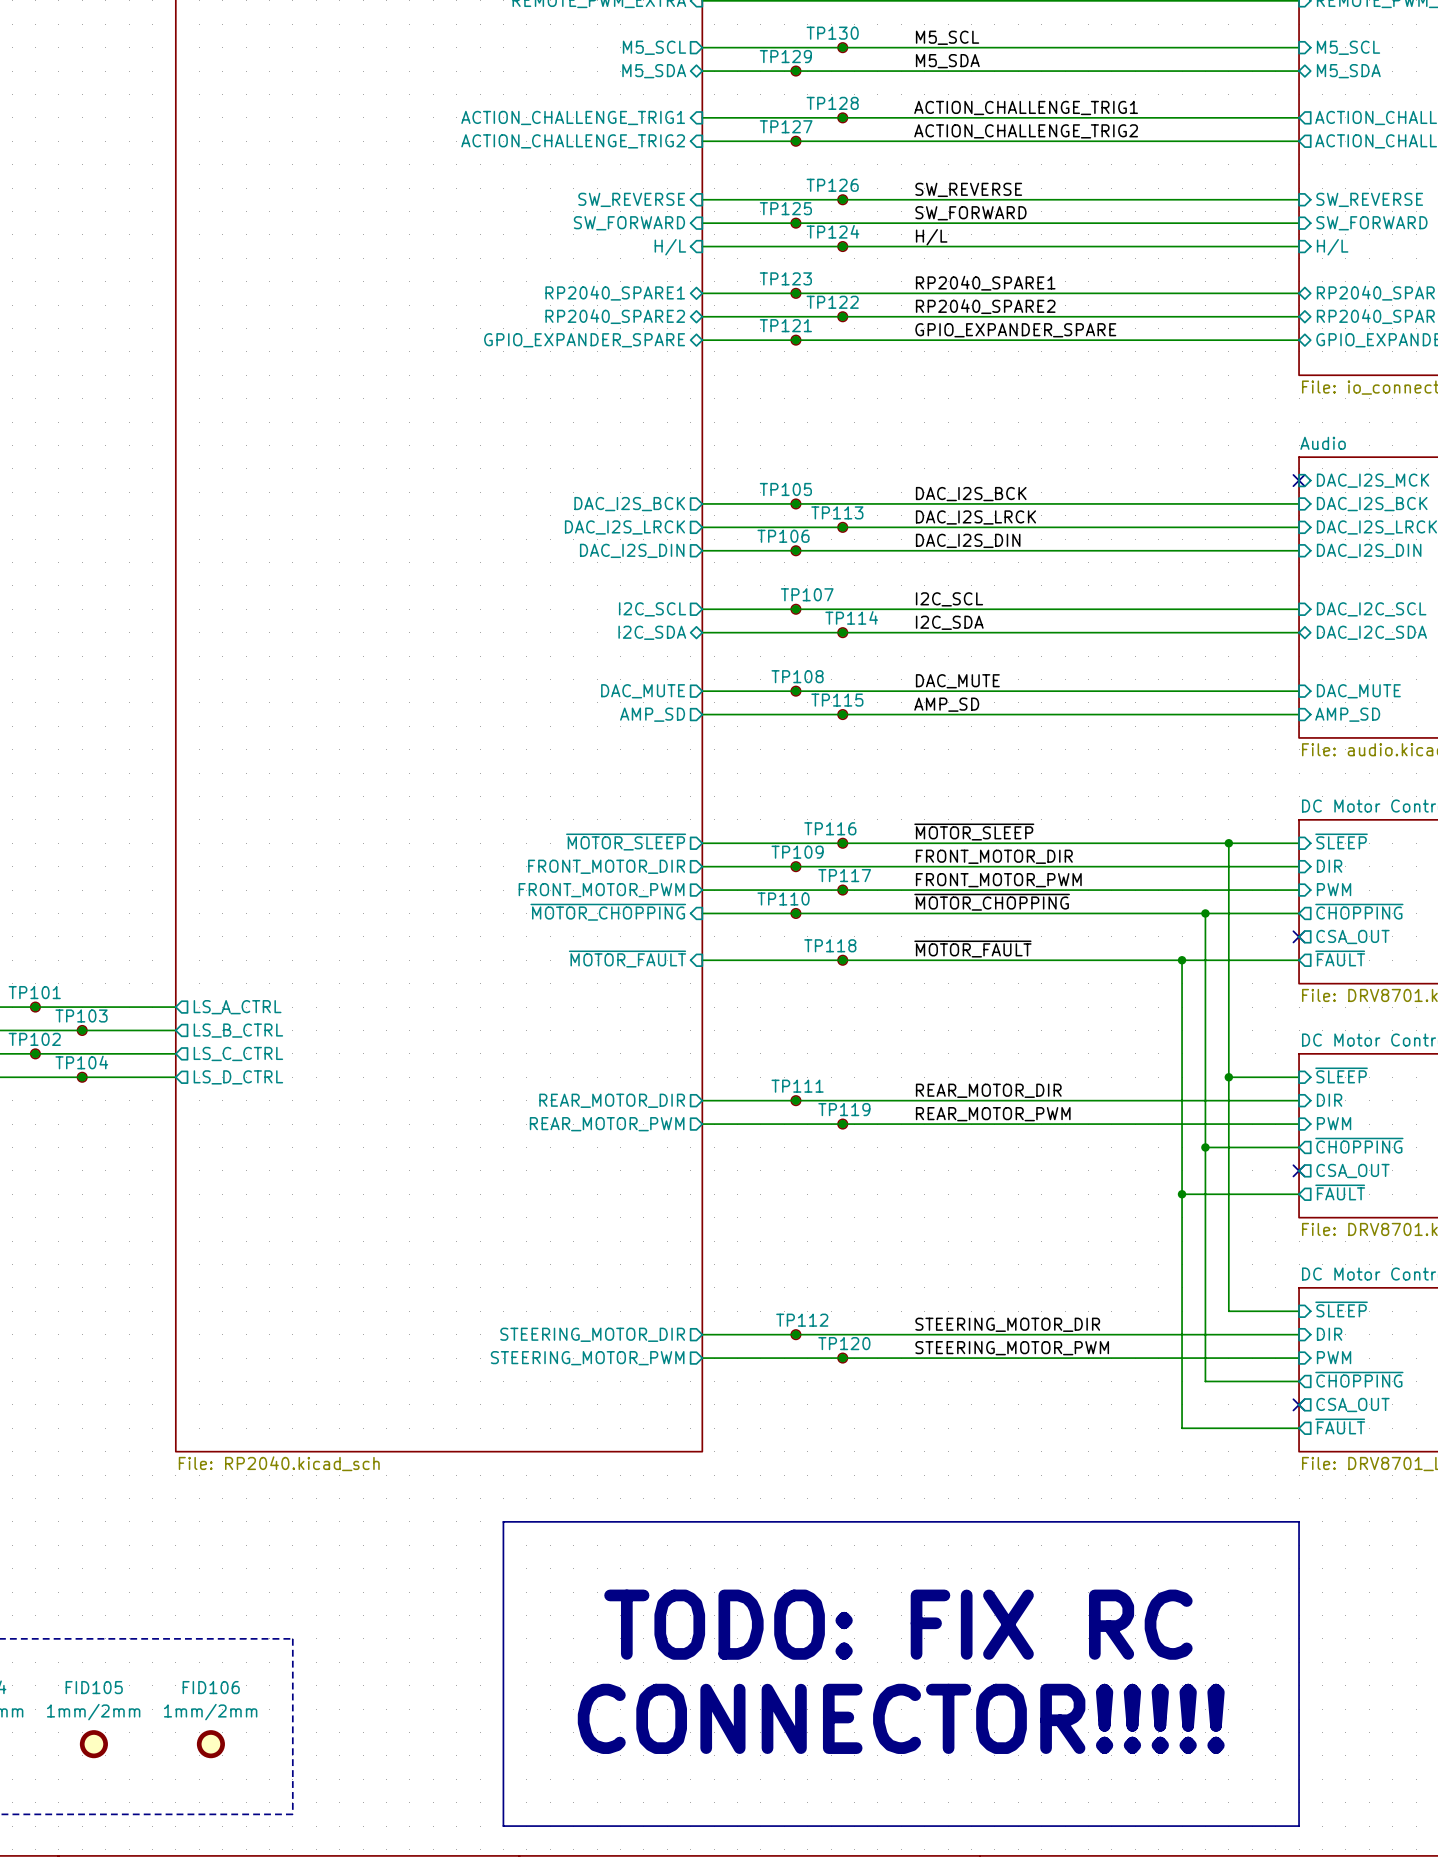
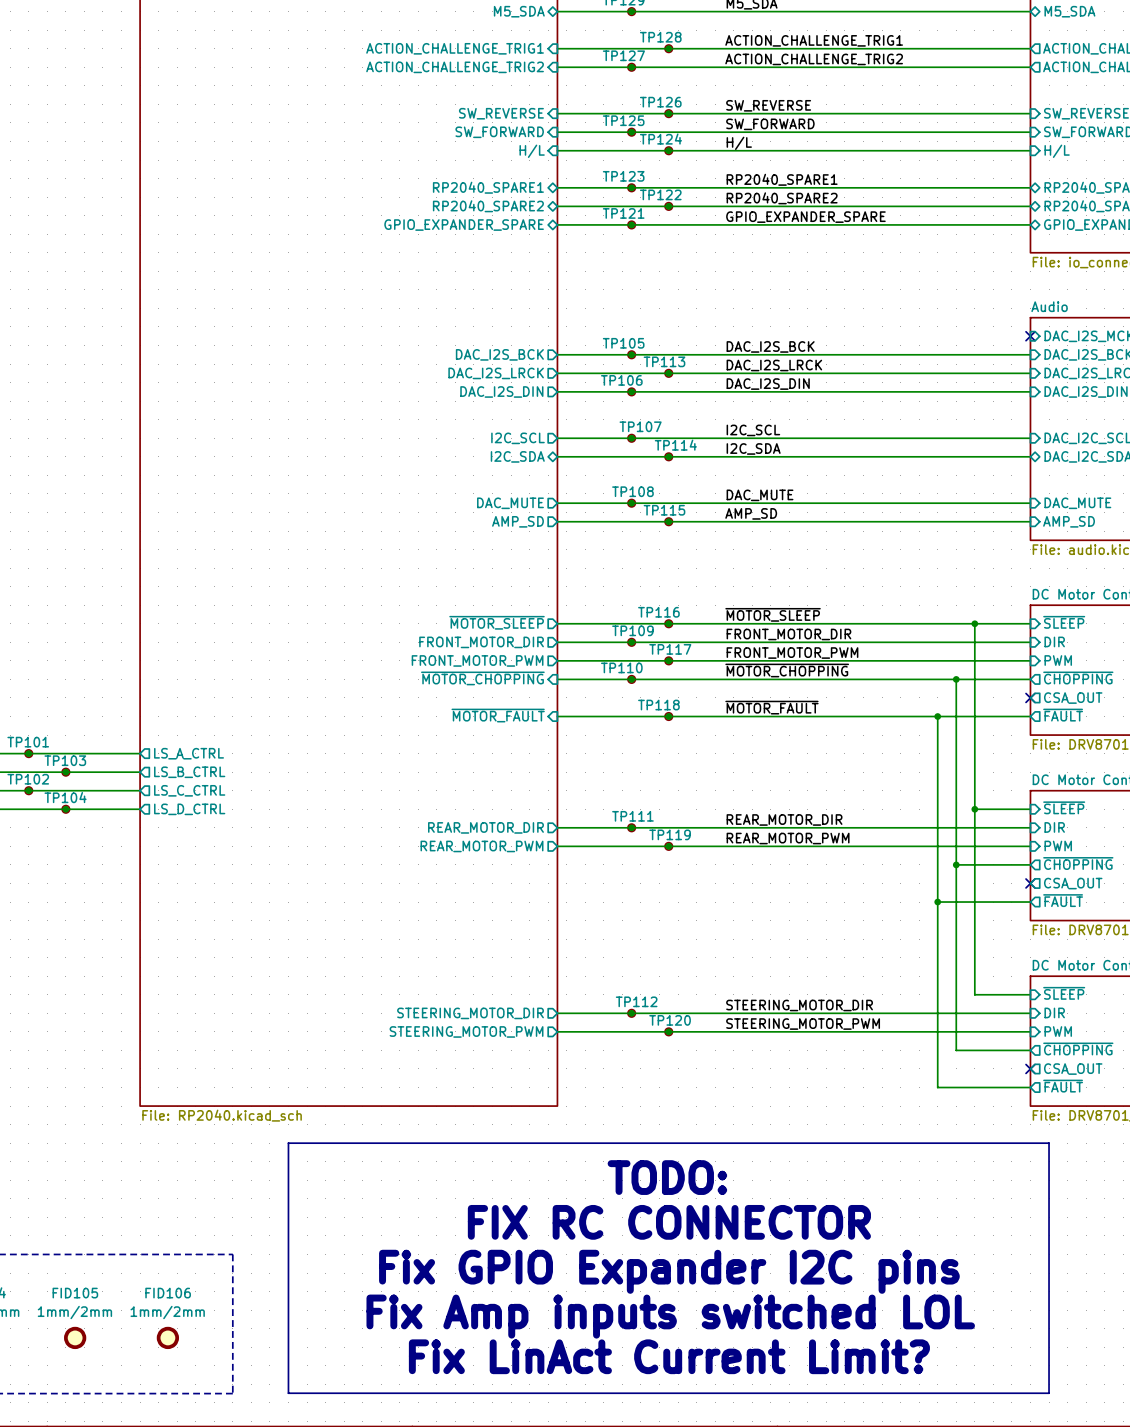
line: (503, 1521) (1299, 1521) (1299, 1826) (503, 1826) (503, 1521) -> (288, 1143) (288, 1393) (1049, 1393) (1049, 1143) (288, 1143)
text: none -> TODO: (667, 1177)
text: none -> FIX RC CONNECTOR (669, 1222)
text: TODO: FIX RC (898, 1624) -> none
text: none -> Fix GPIO Expander I2C pins (669, 1271)
text: none -> Fix Amp inputs switched LOL (670, 1316)
text: CONNECTOR!!!!! (901, 1718) -> none
text: none -> Fix LinAct Current Limit? (669, 1356)

